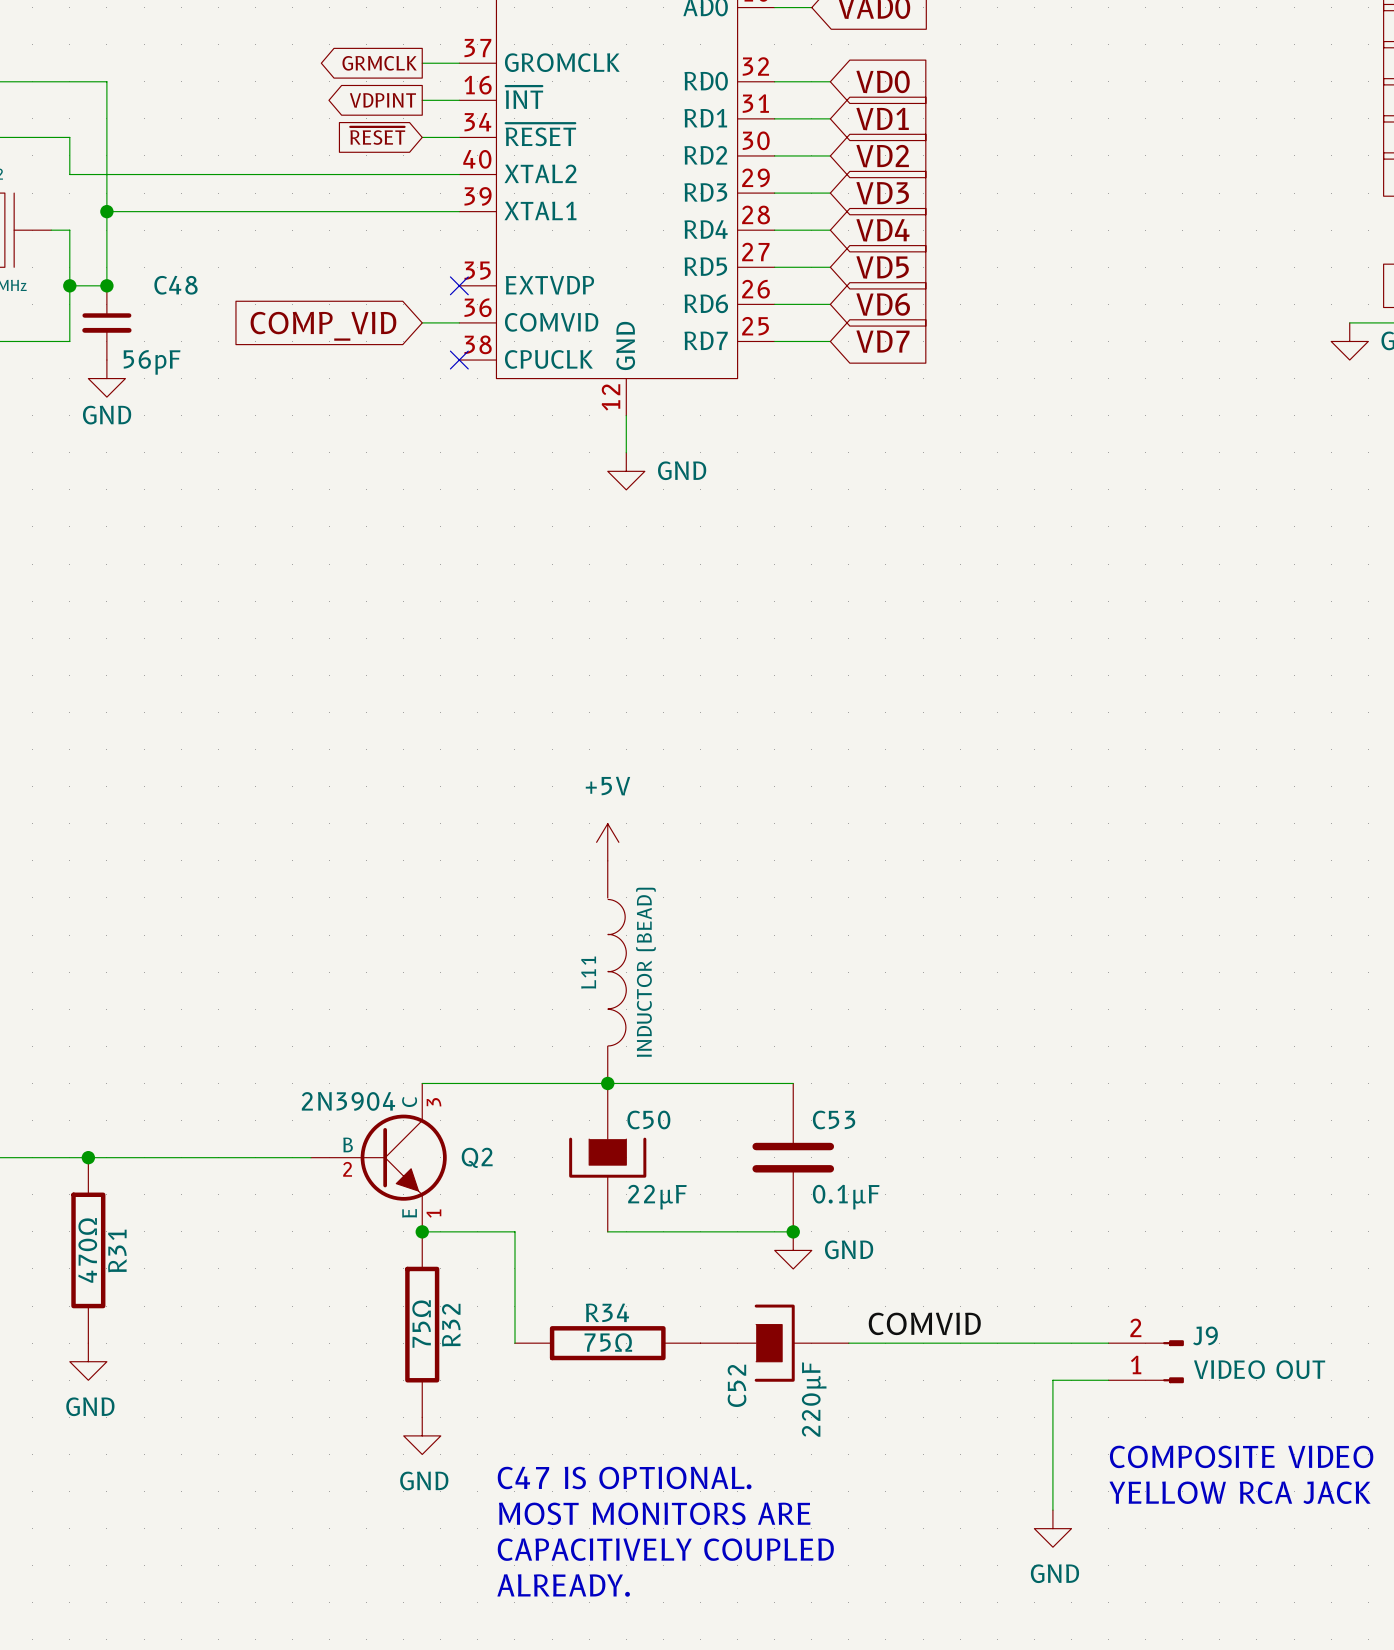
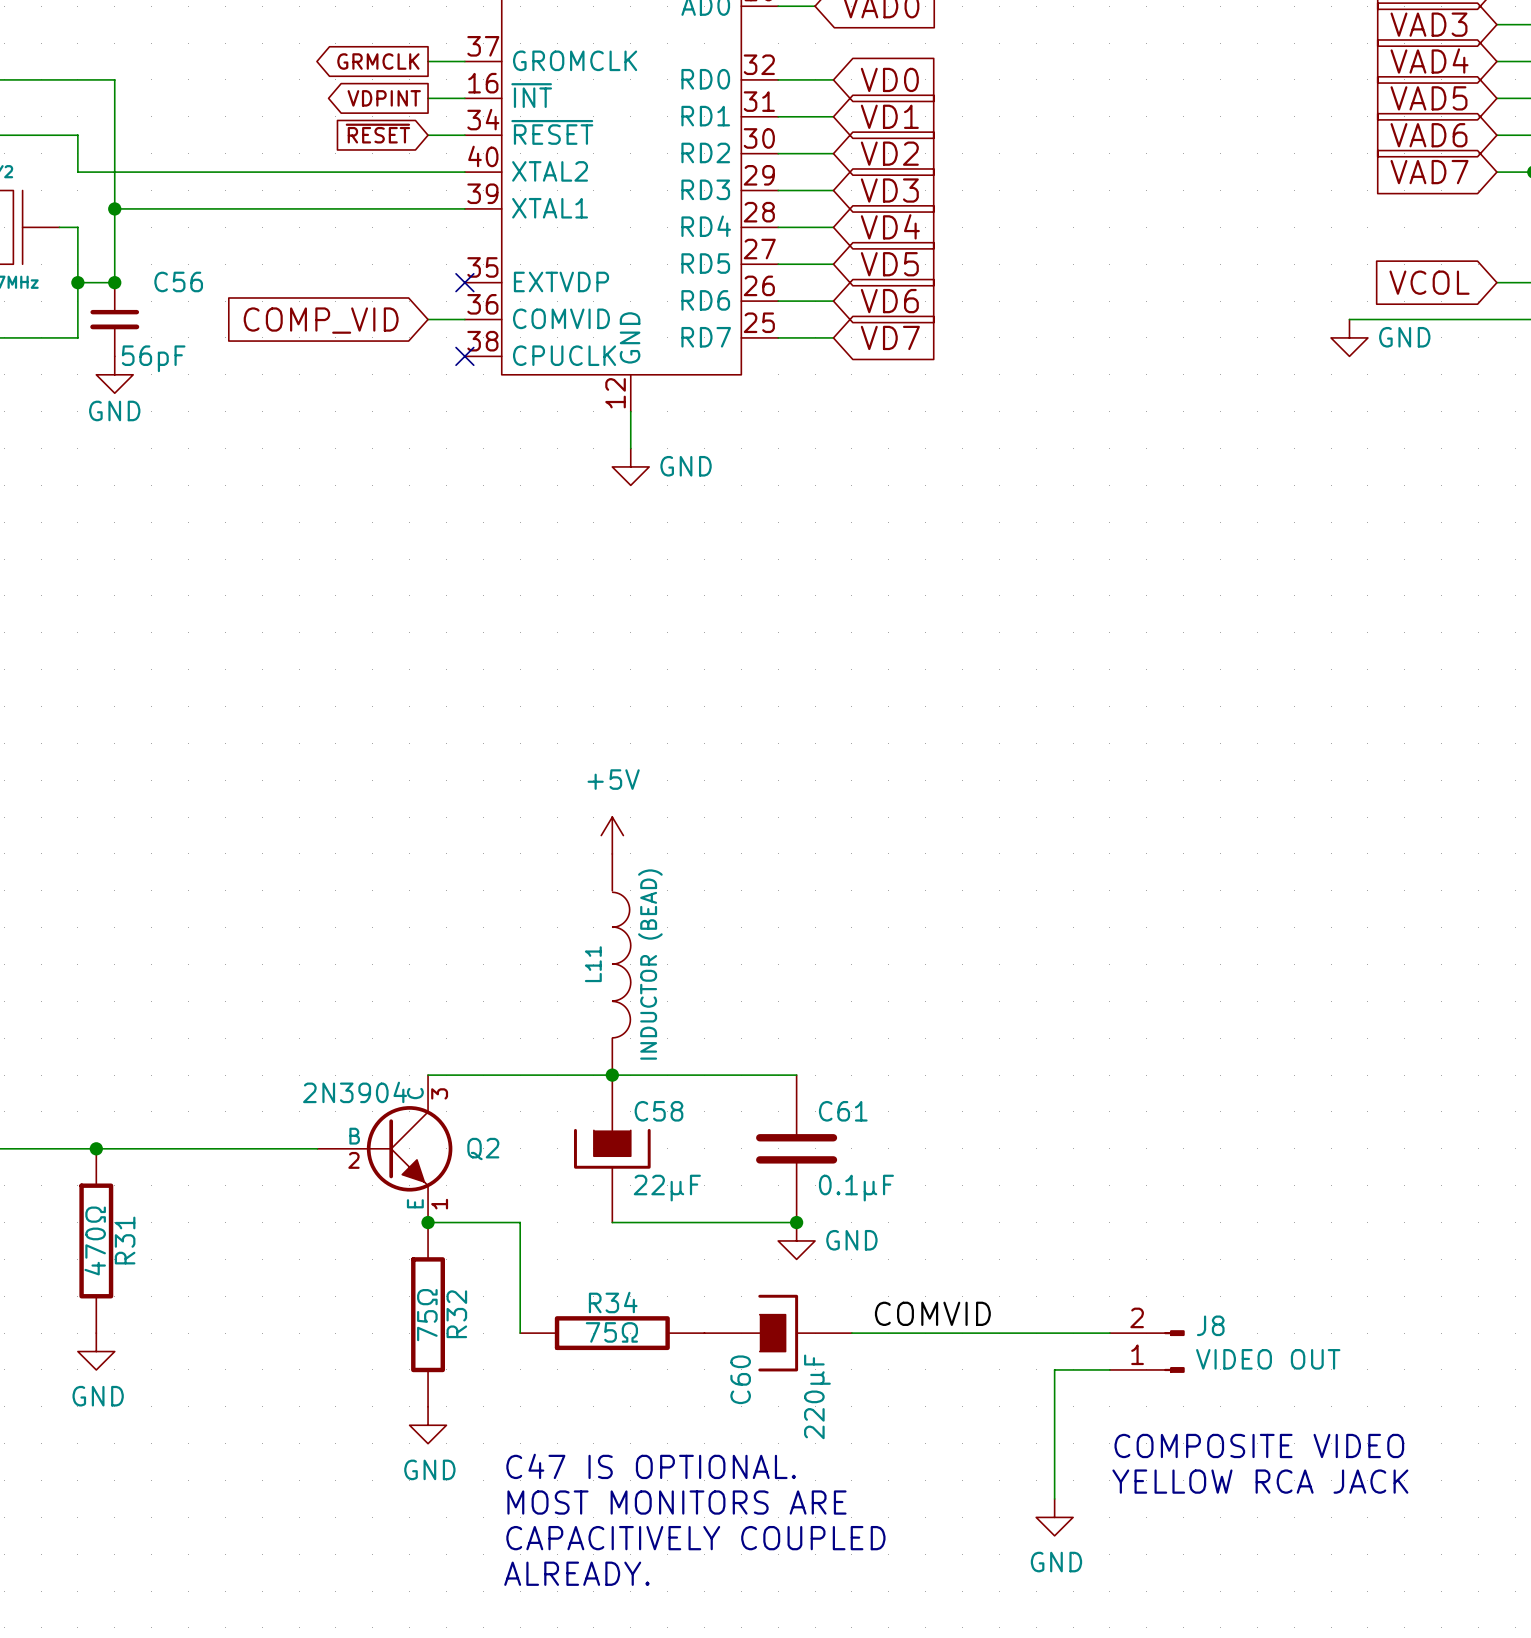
C48 name: C48 (175, 285) -> C56 (178, 281)
C50 name: C50 (648, 1120) -> C58 (658, 1111)
C53 name: C53 (834, 1120) -> C61 (843, 1111)
J9 name: J9 (1205, 1335) -> J8 (1210, 1325)
C52 name: C52 (737, 1385) -> C60 (740, 1379)

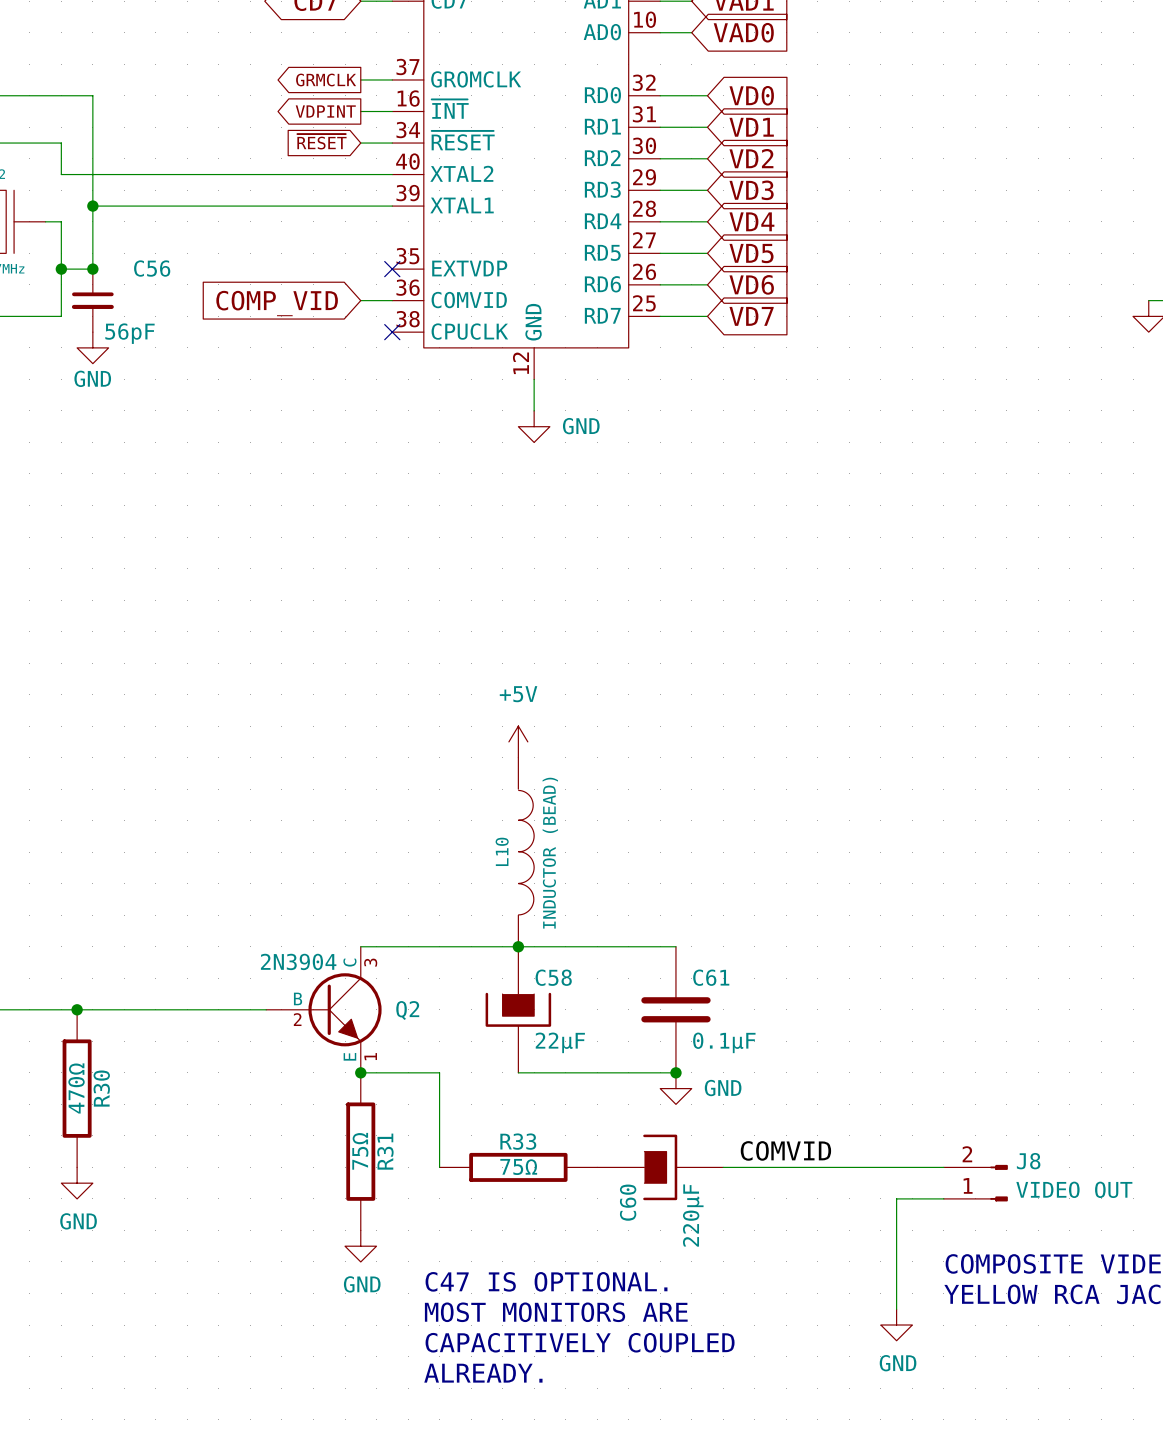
L11 name: L11 (593, 964) -> L10 (502, 851)
R31 name: R31 (125, 1240) -> R30 (101, 1088)
R34 name: R34 (613, 1302) -> R33 (518, 1141)
R32 name: R32 (456, 1314) -> R31 (385, 1151)

